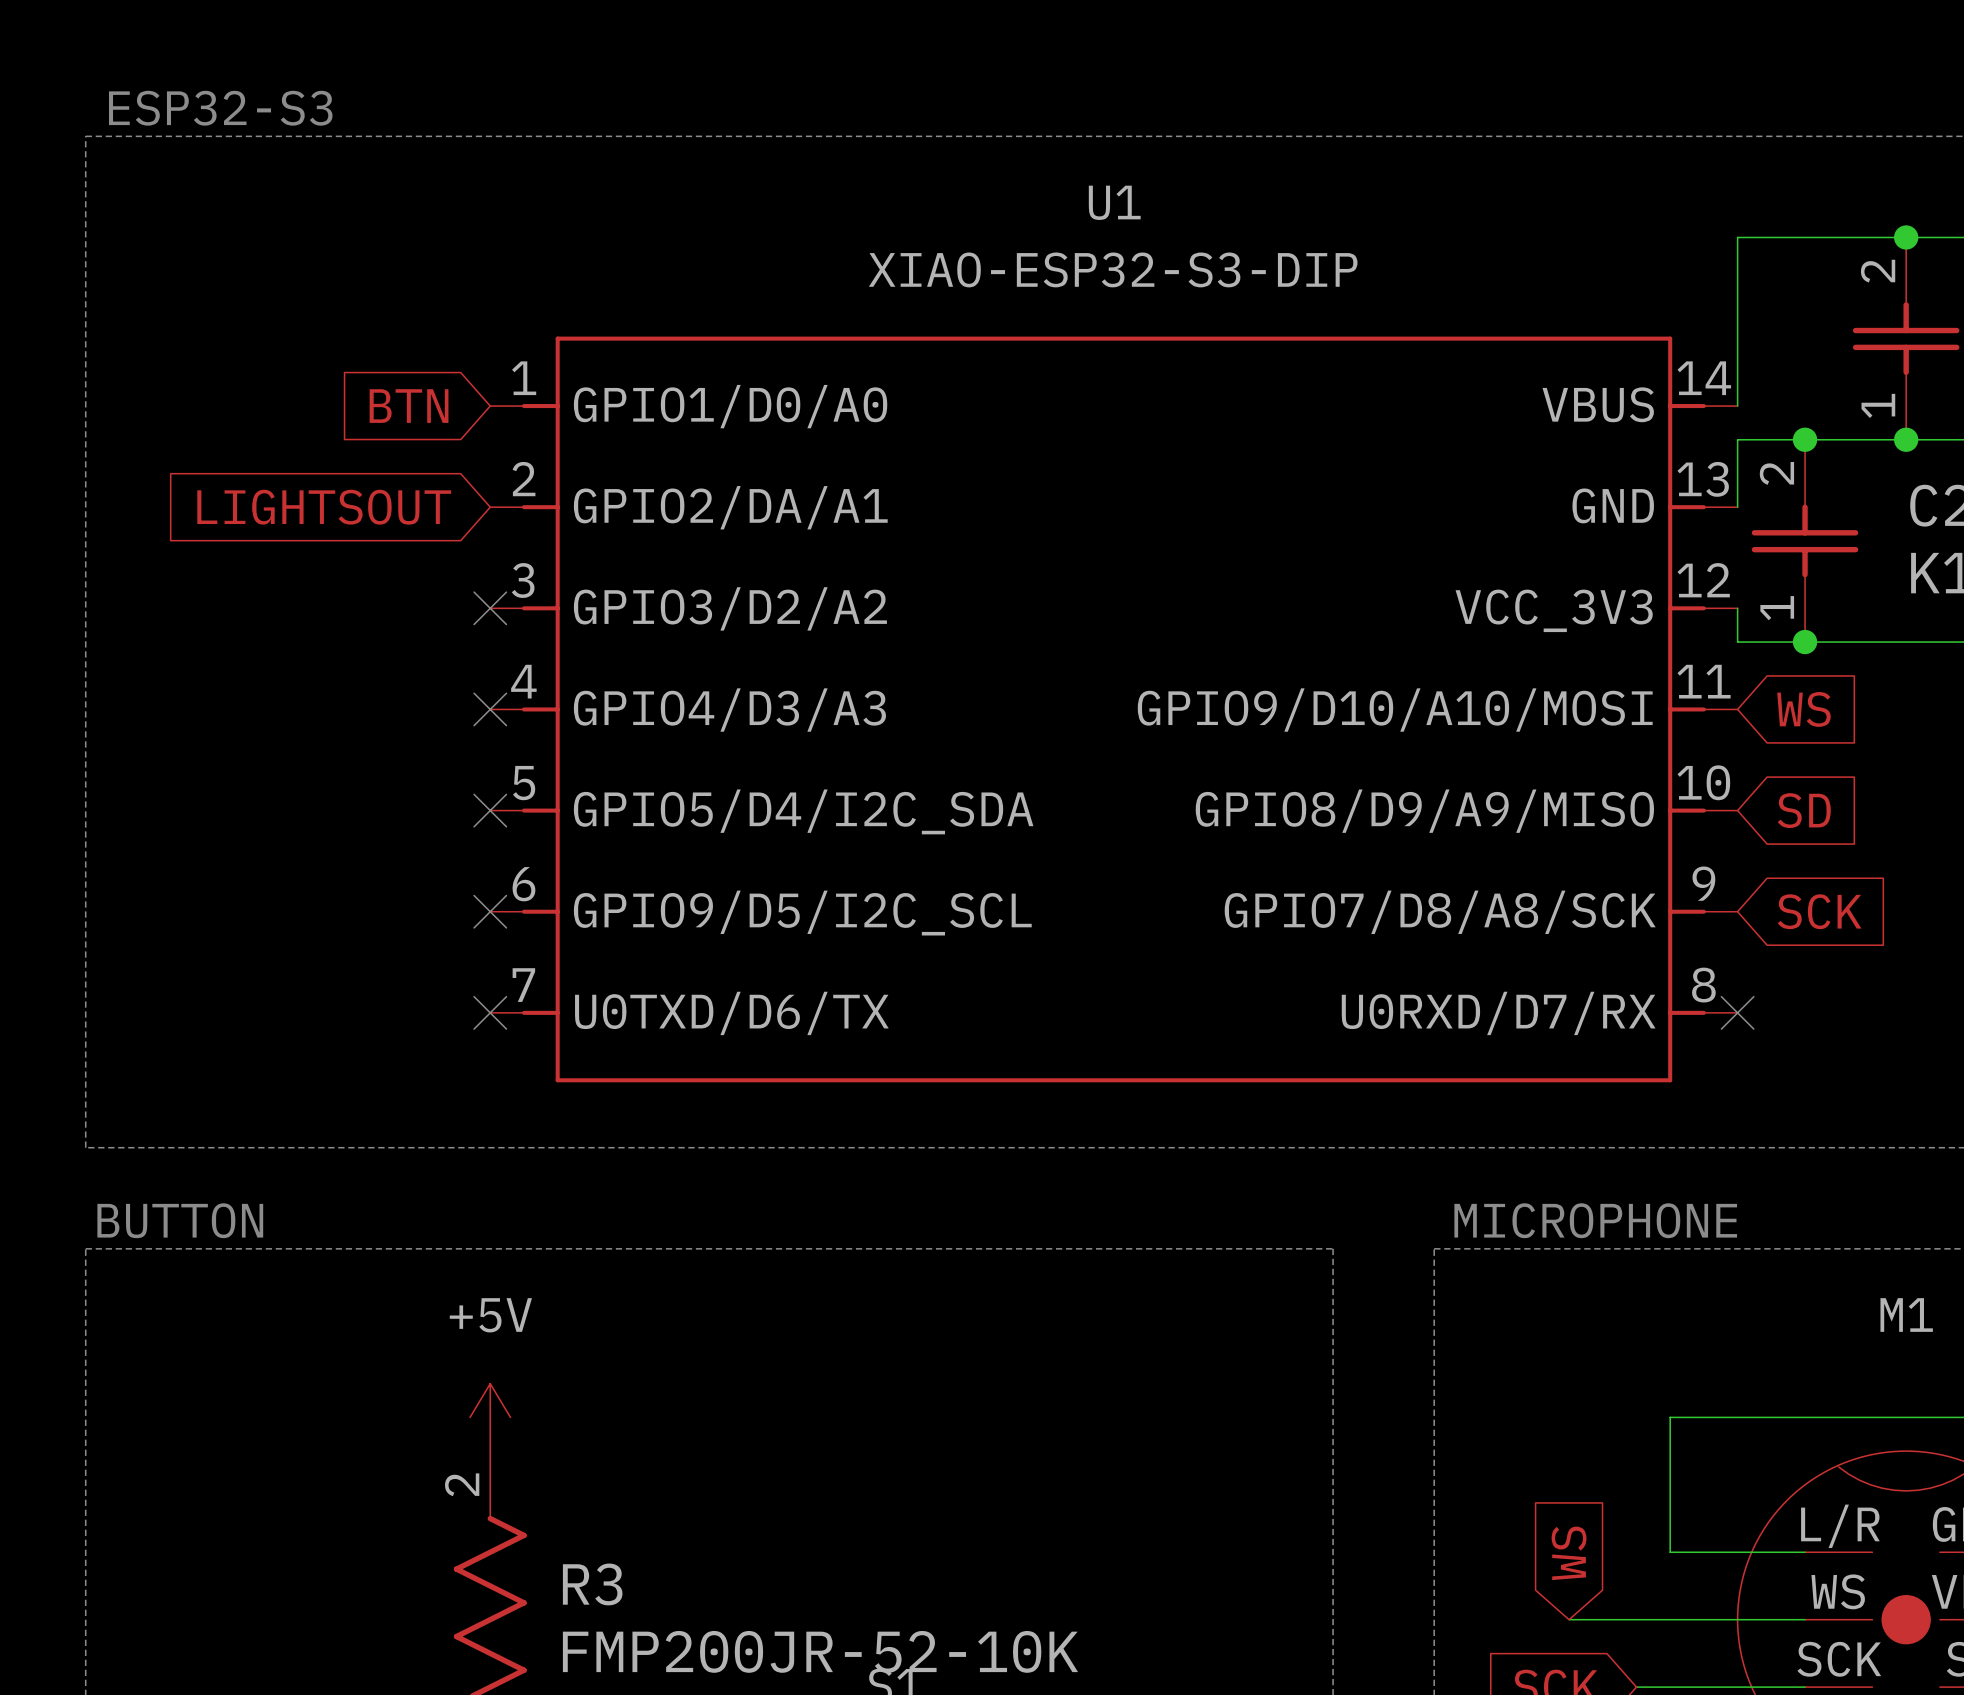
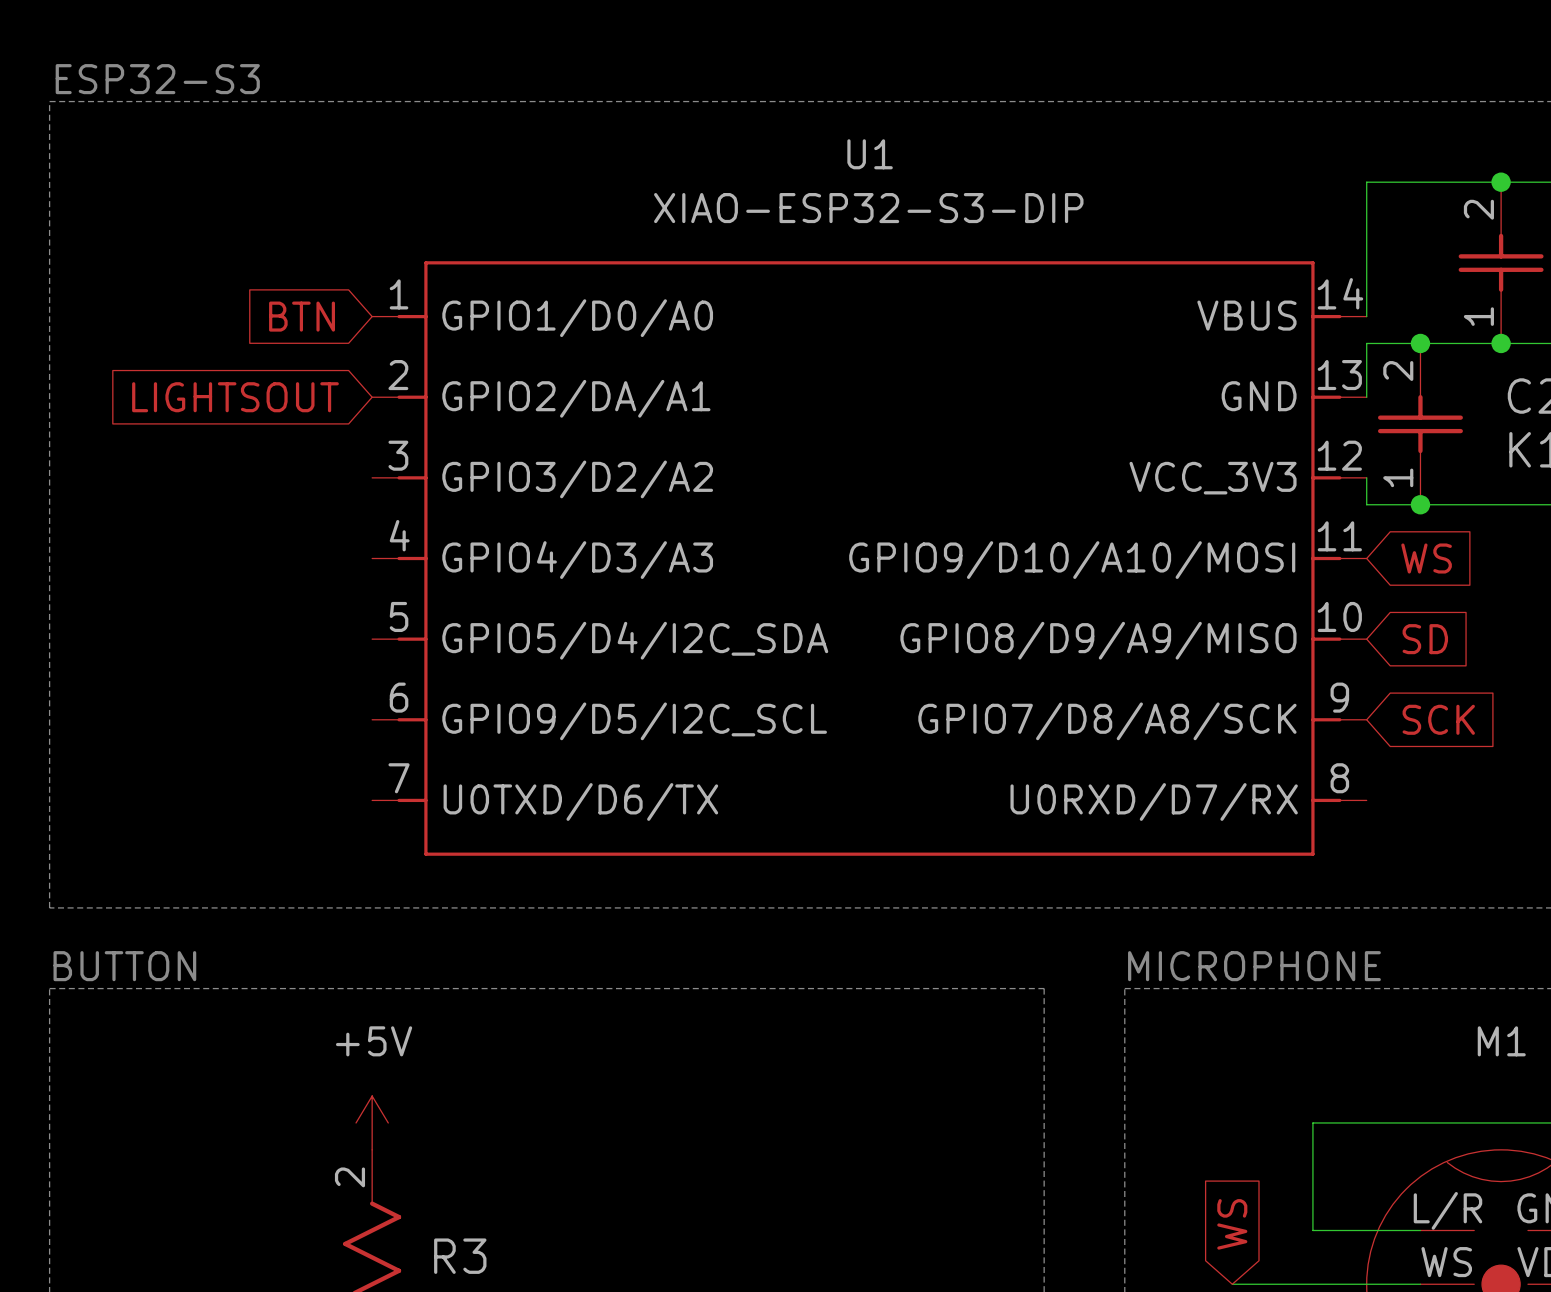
no-connect mark: (490, 608) -> none
no-connect mark: (490, 709) -> none
no-connect mark: (490, 810) -> none
no-connect mark: (490, 911) -> none
no-connect mark: (490, 1012) -> none
no-connect mark: (1737, 1012) -> none

